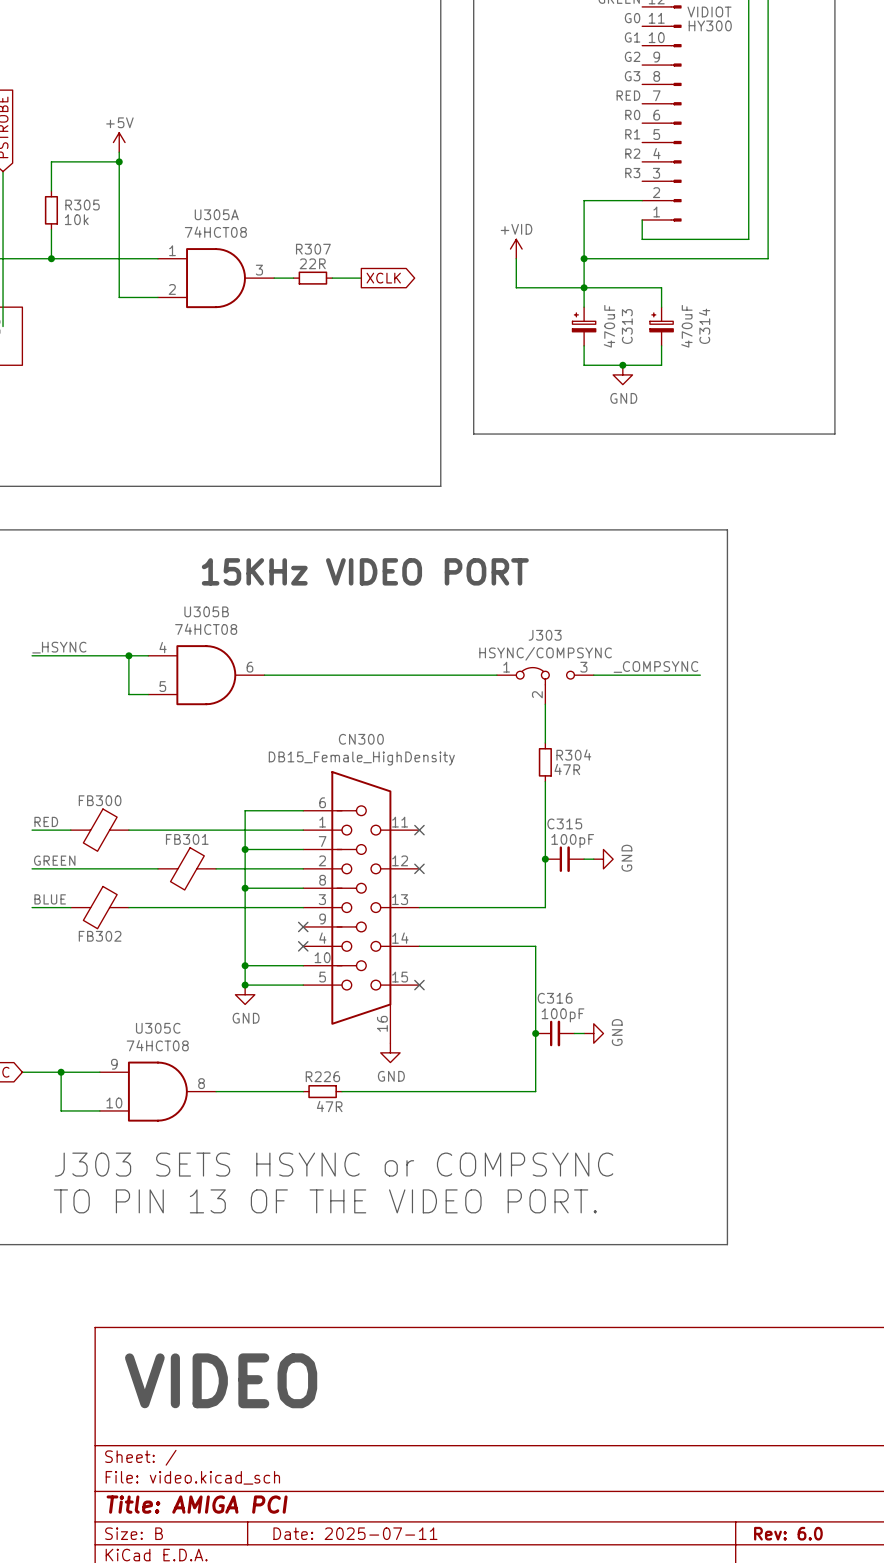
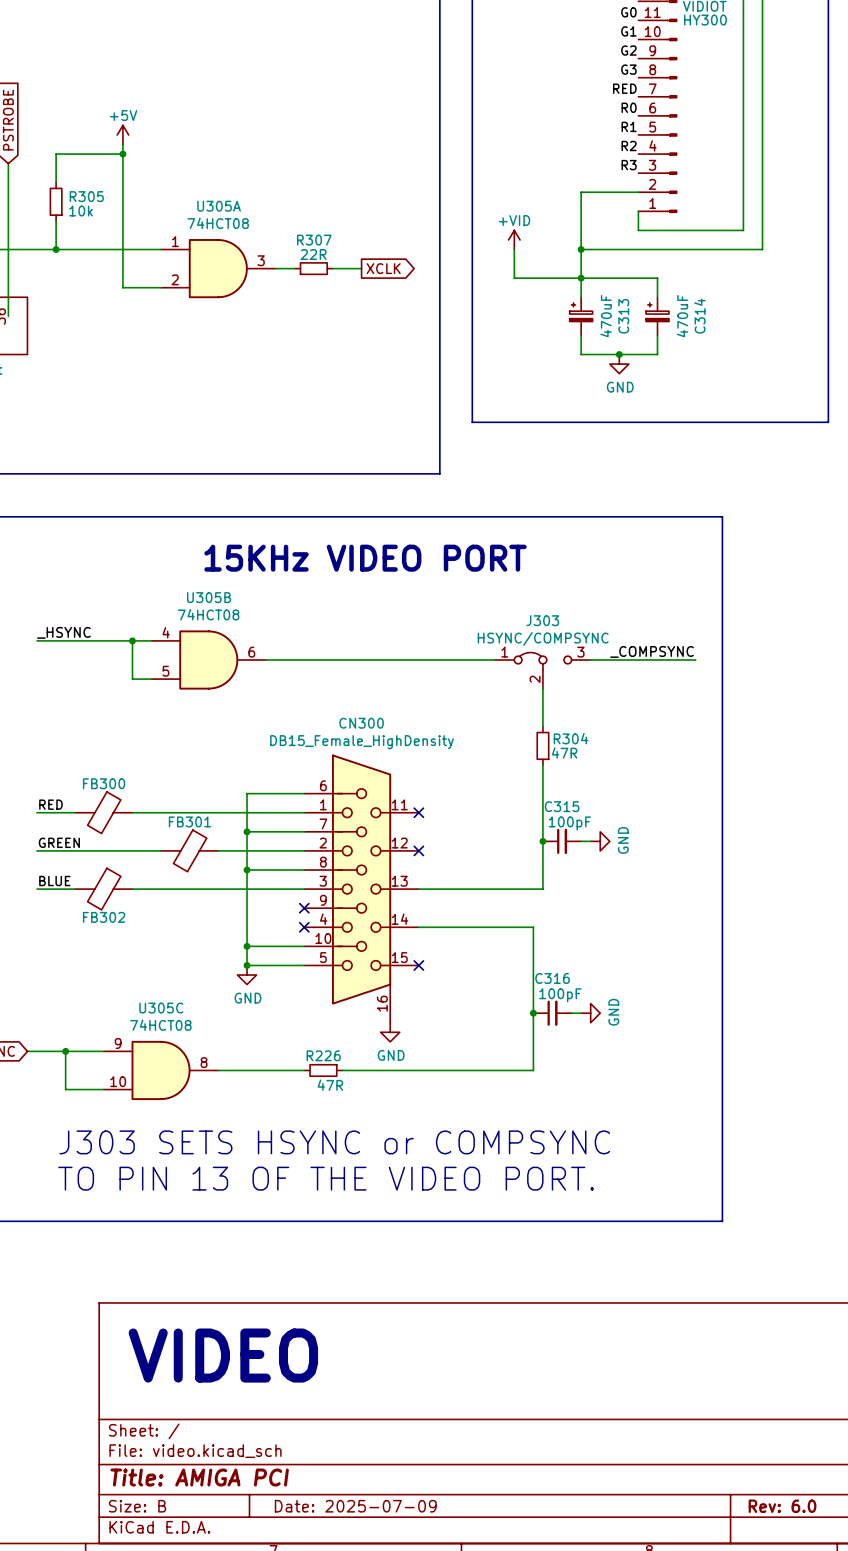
title block: Date: 2025-07-11 (355, 1533) -> Date: 2025-07-09 (355, 1506)

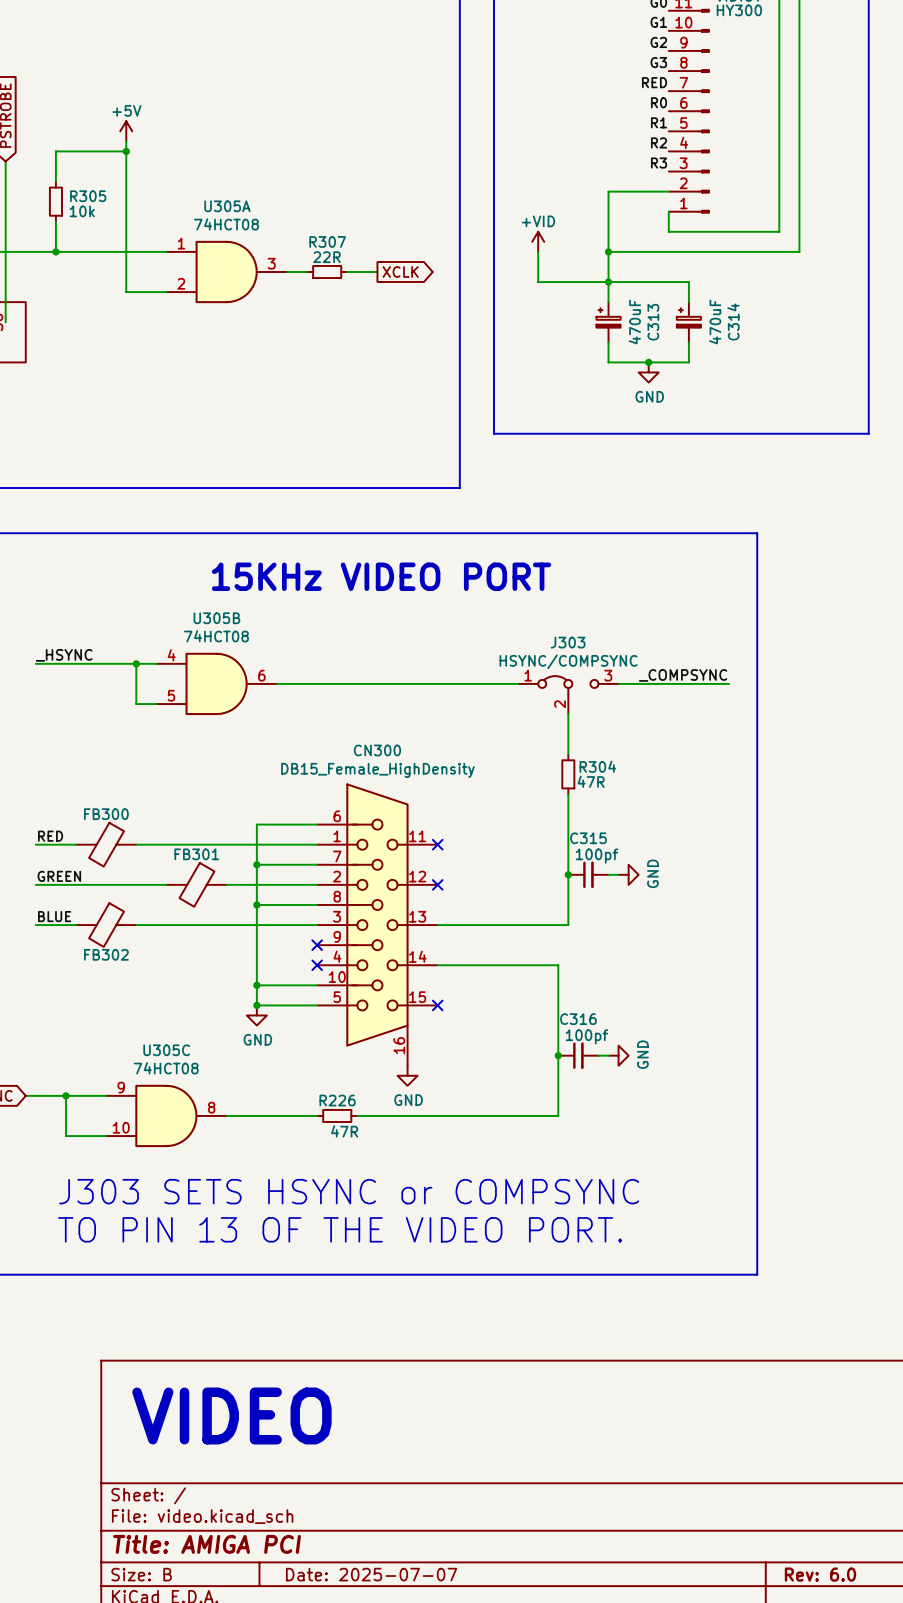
C315 value: 100pF (569, 823) -> 100pf (596, 856)
C316 value: 100pF (560, 995) -> 100pf (586, 1036)
title block: Date: 2025-07-09 (355, 1506) -> Date: 2025-07-07 (371, 1574)

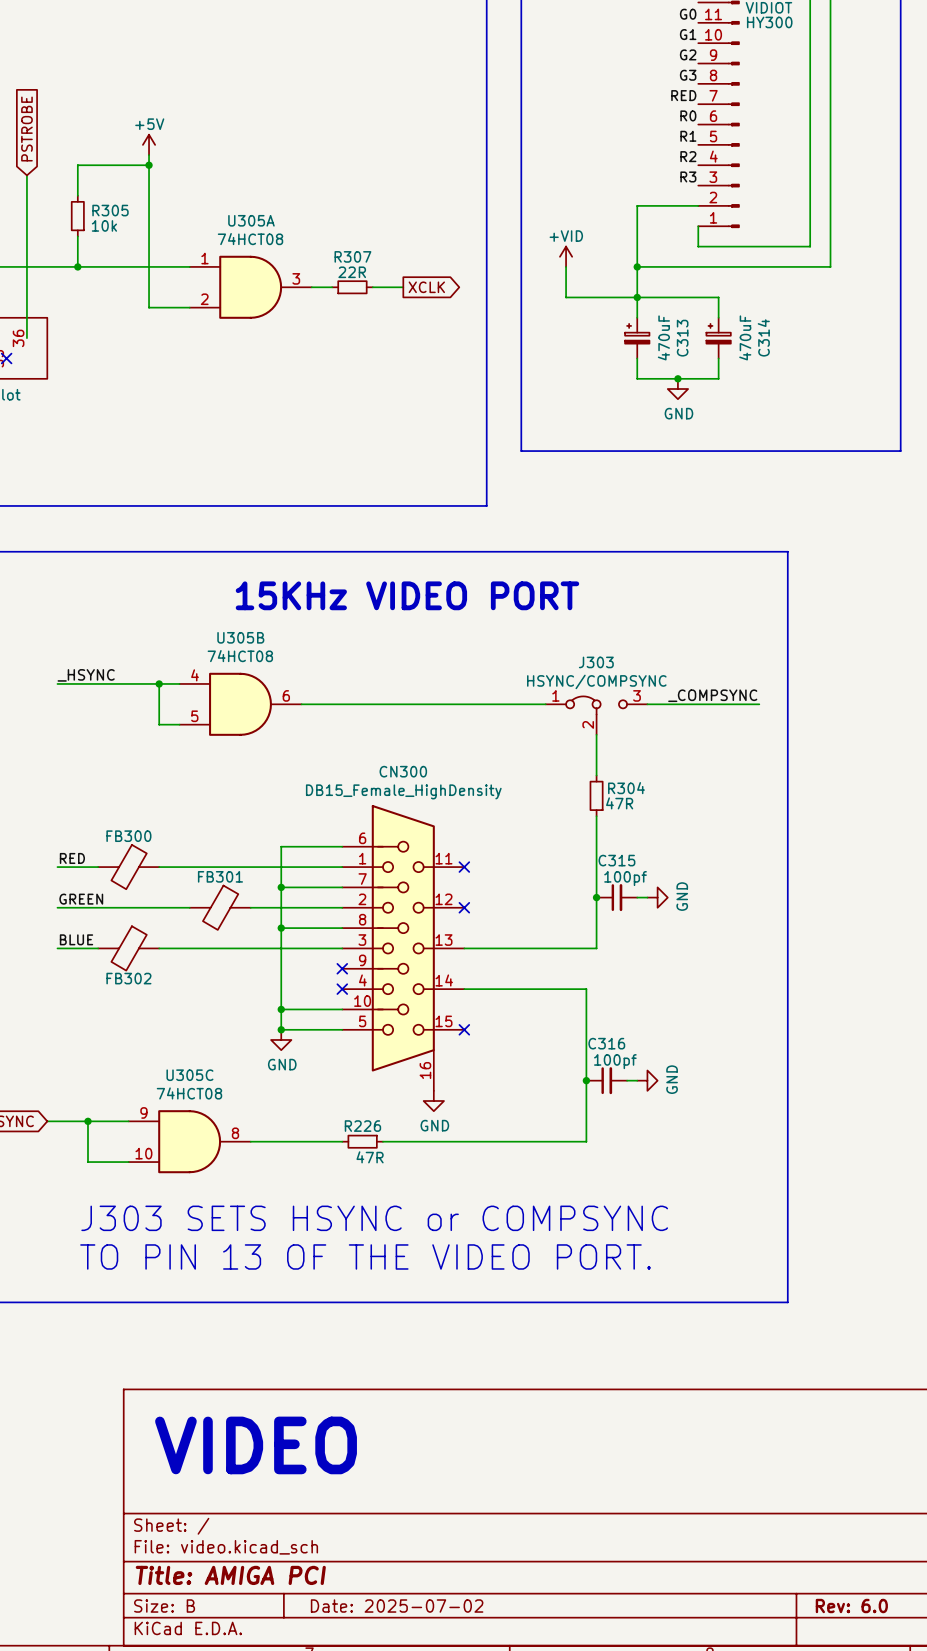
title block: Date: 2025-07-07 (371, 1574) -> Date: 2025-07-02 (397, 1606)

